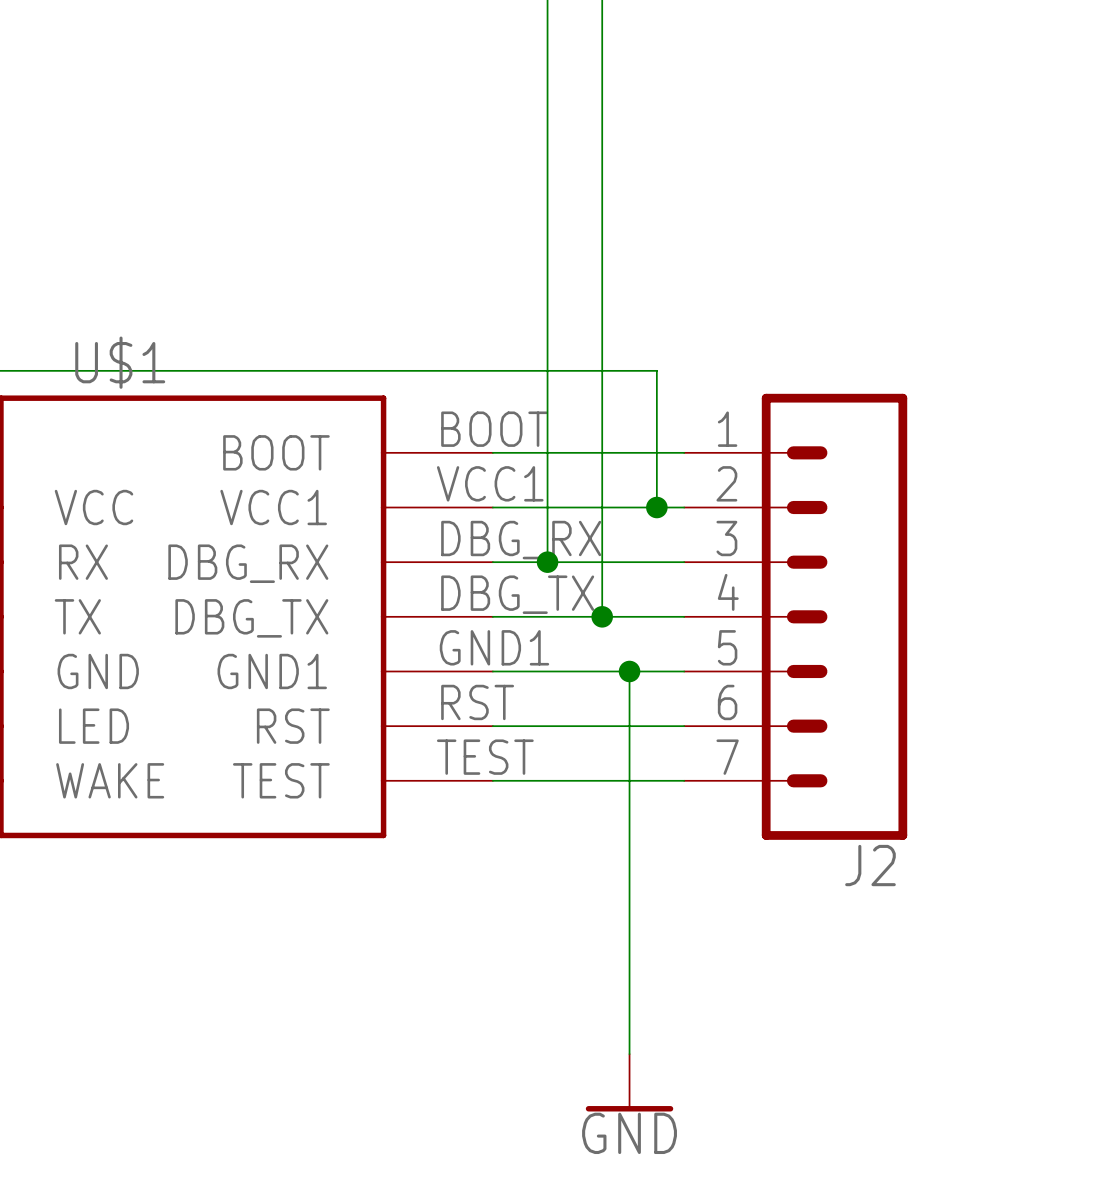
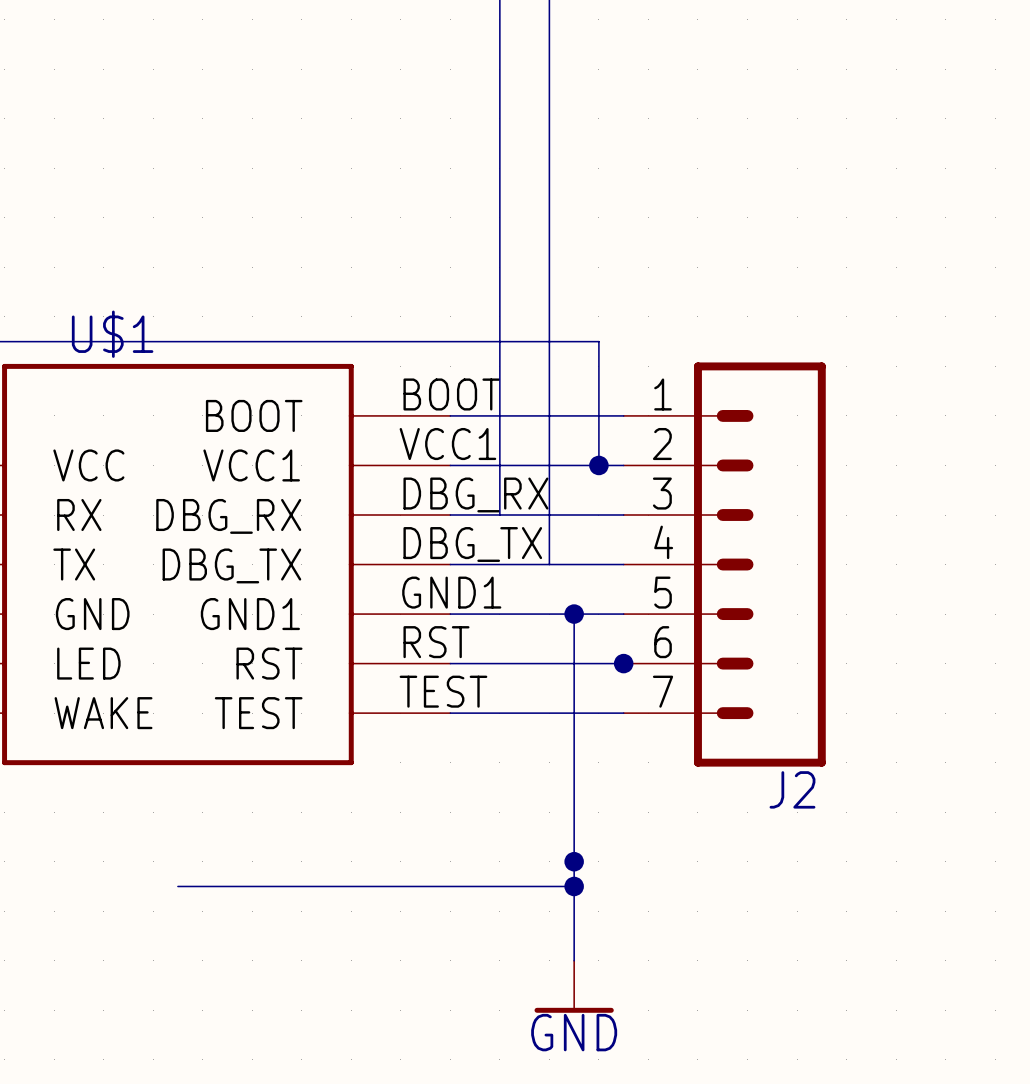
junction: (547, 562) -> none
junction: (602, 616) -> none
junction: none -> (623, 663)
junction: none -> (574, 861)
wire: none -> (177, 886) (574, 886)
junction: none -> (574, 886)

